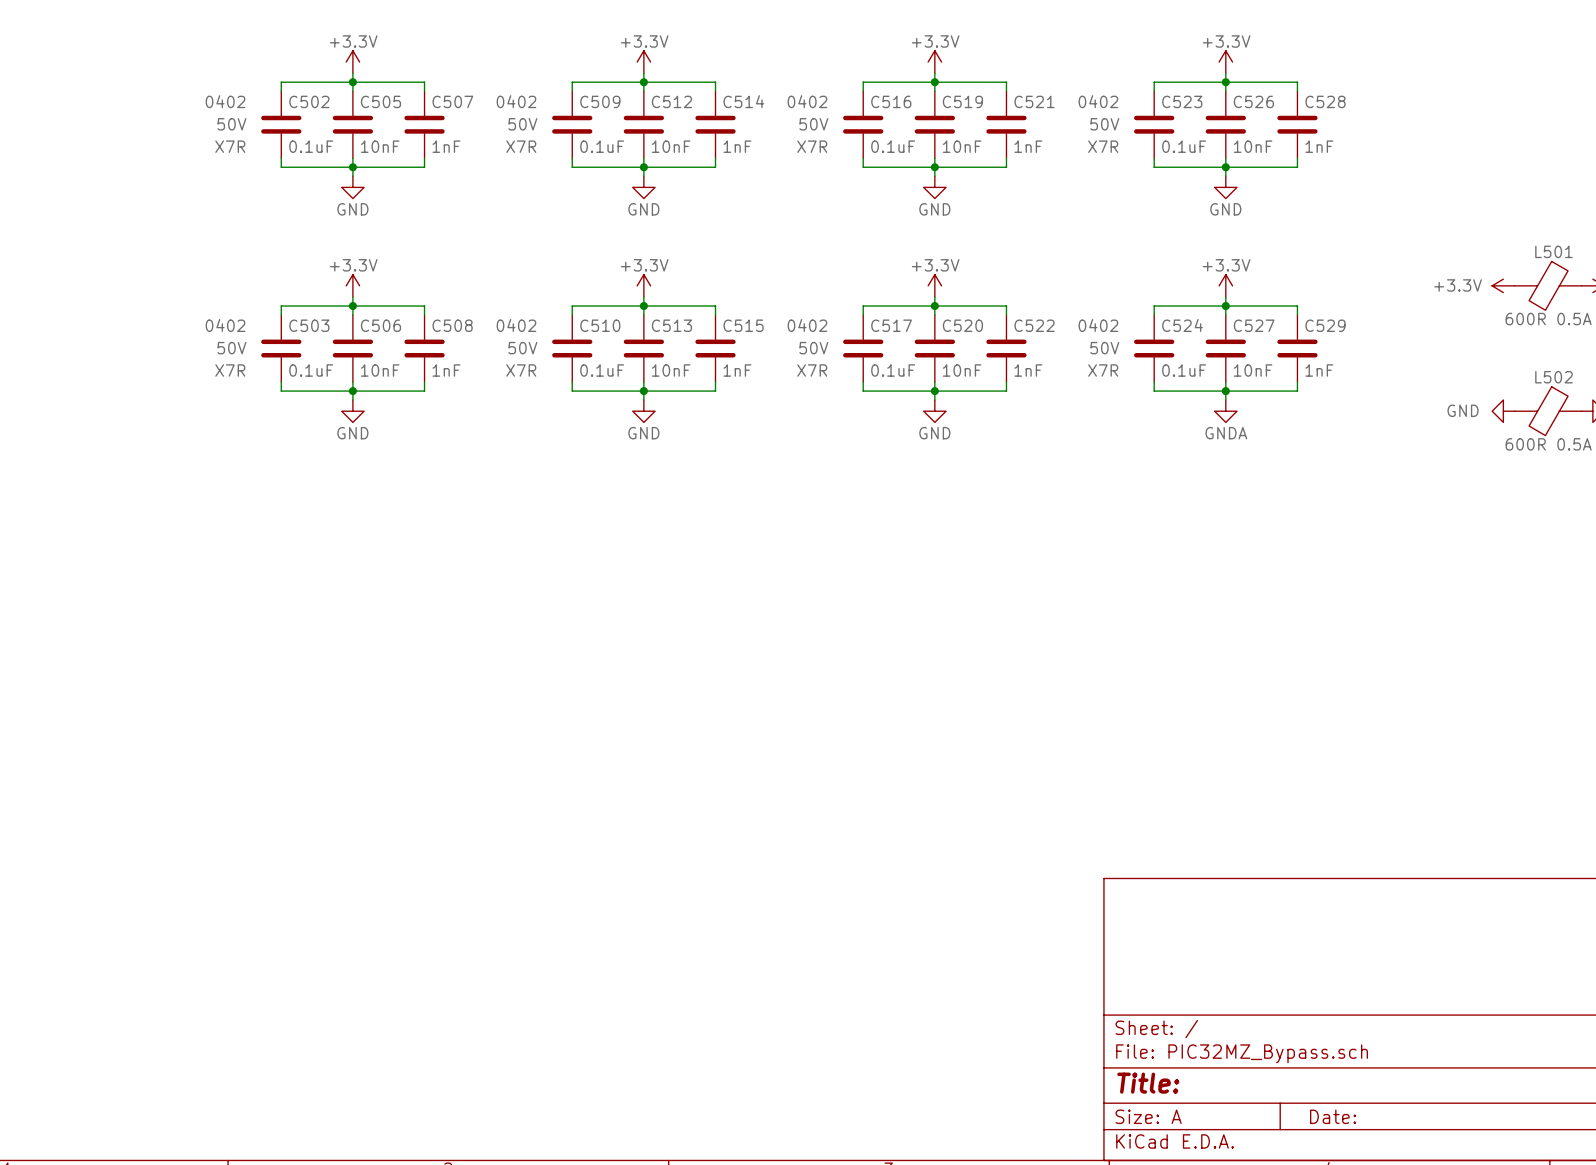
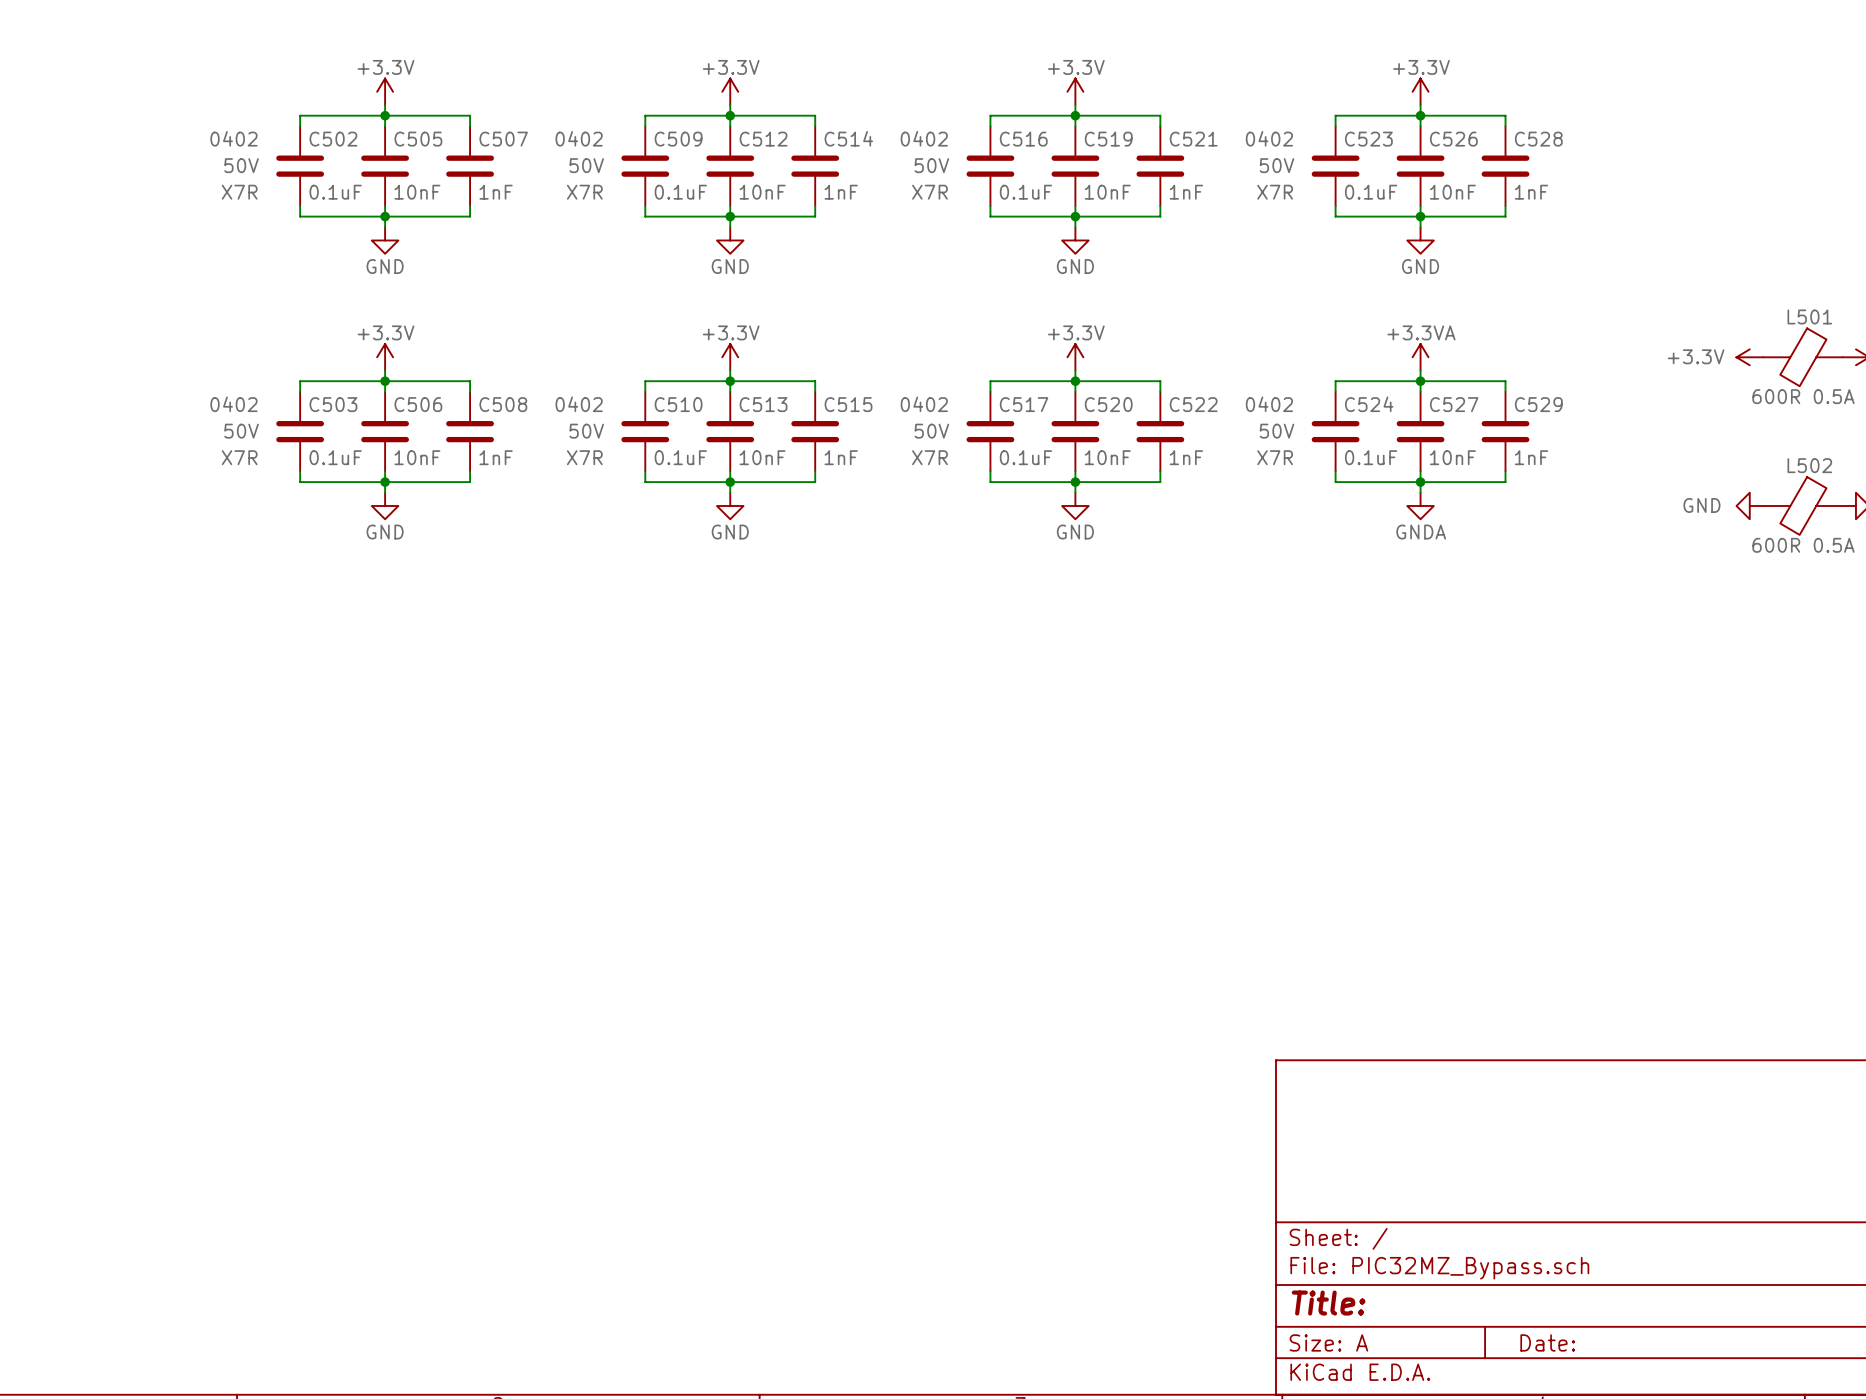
power symbol: +3.3V (1225, 285) -> +3.3VA (1420, 357)

